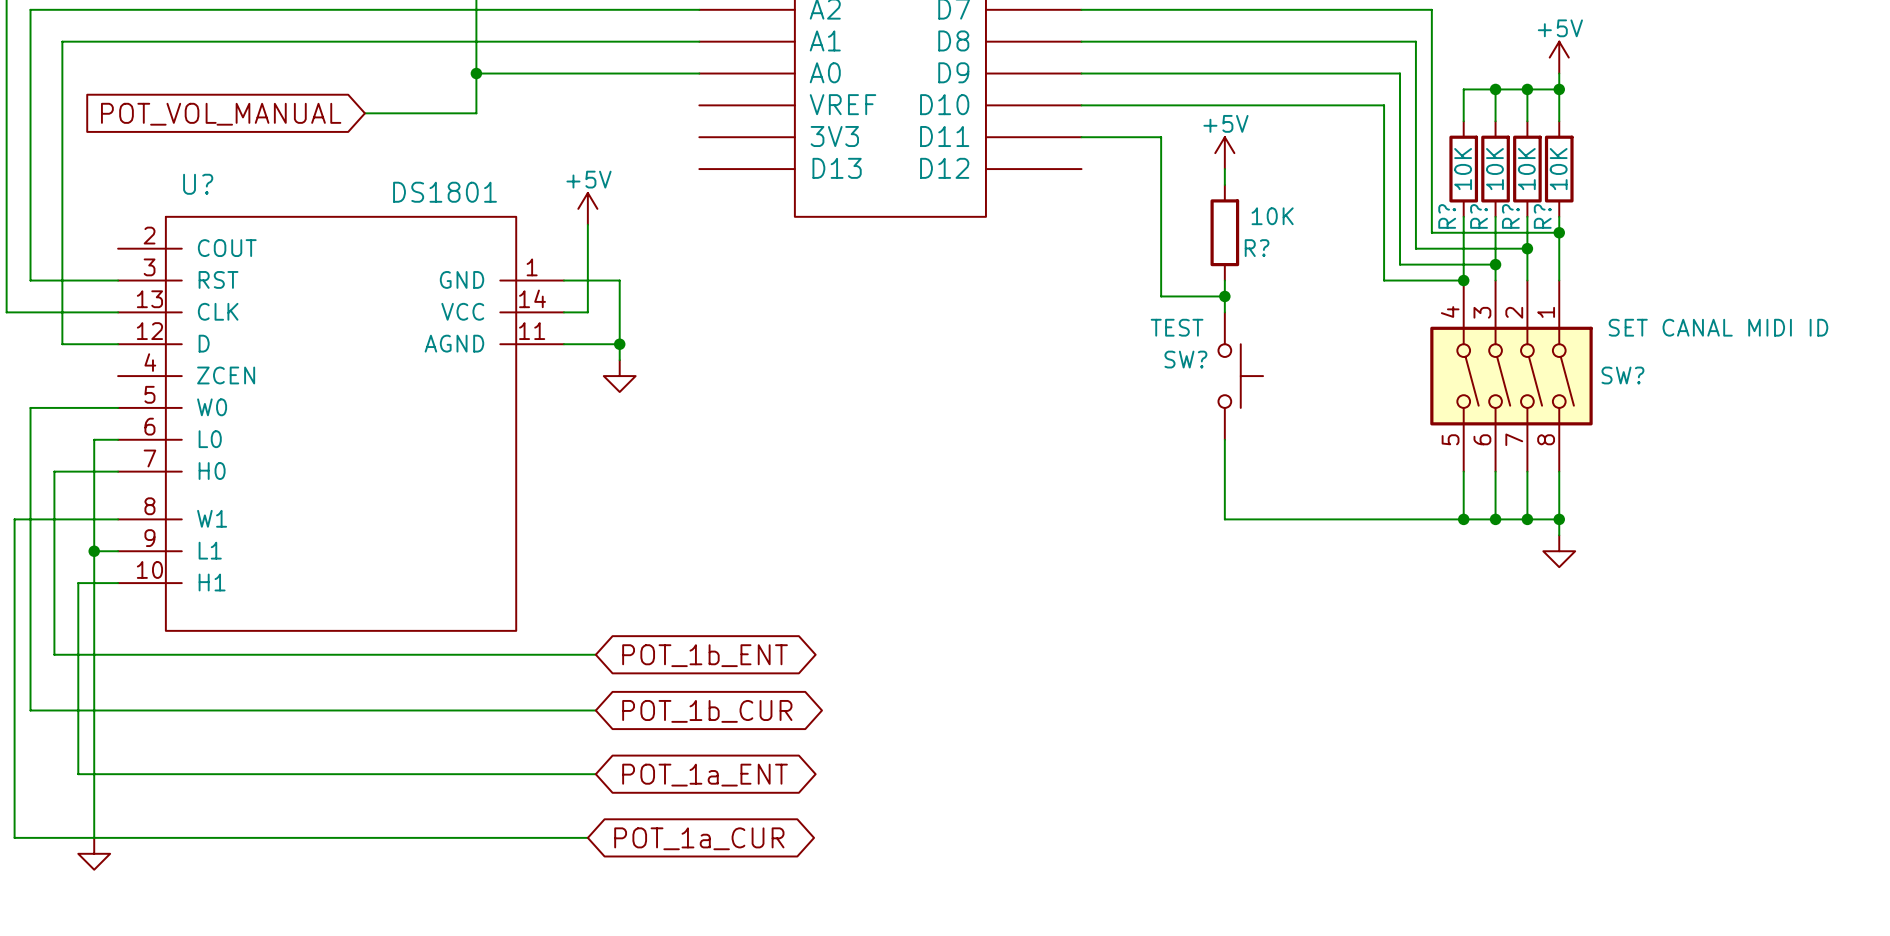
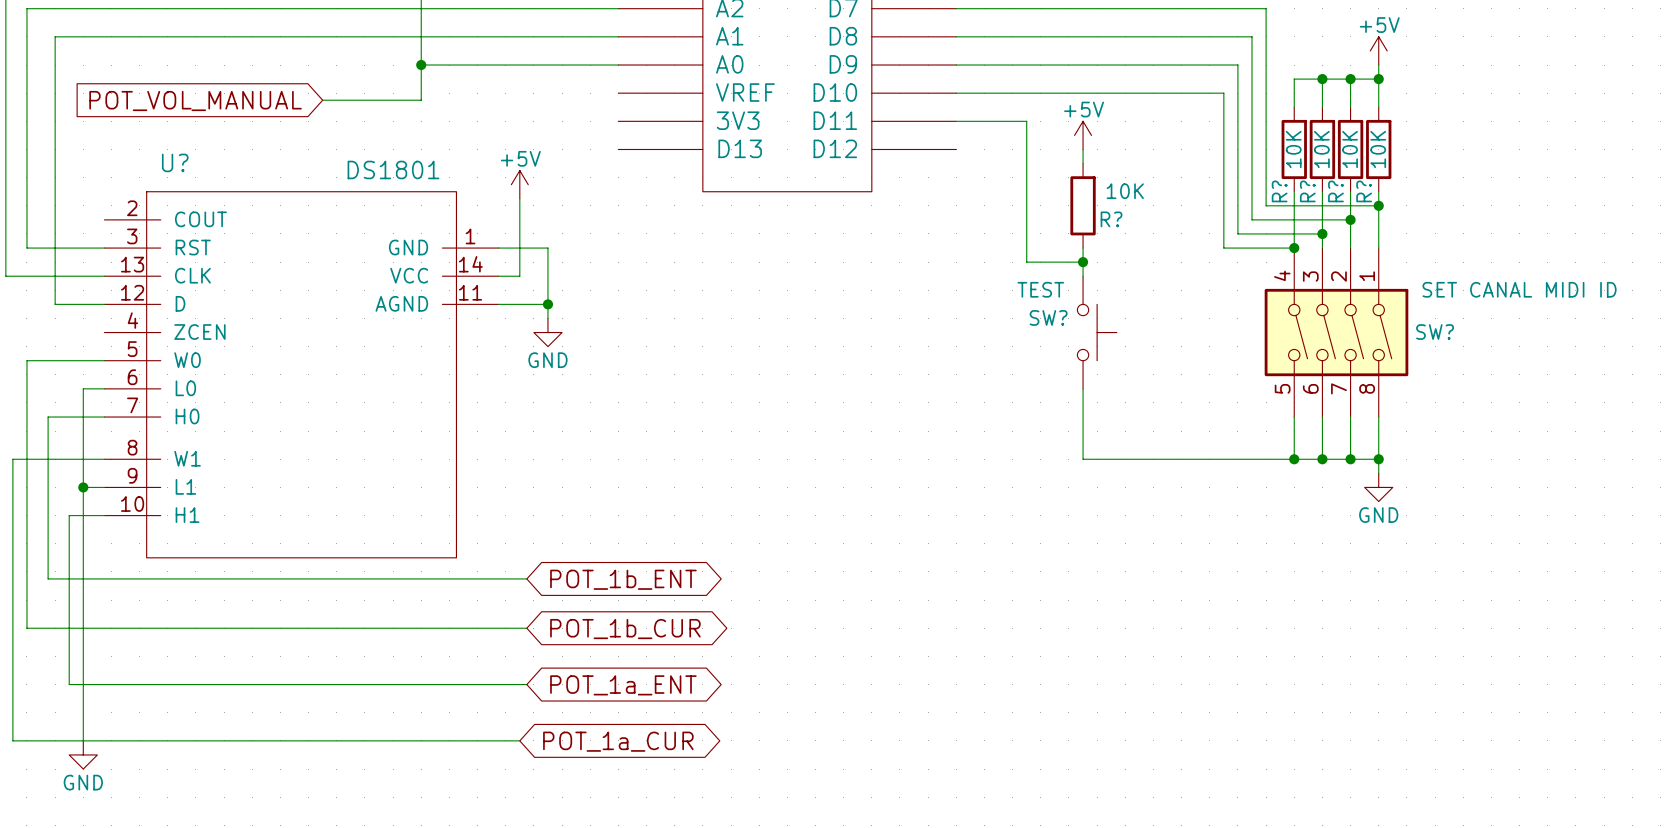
power symbol text: none -> GND (547, 360)
power symbol text: none -> GND (1378, 515)
power symbol text: none -> GND (83, 782)

